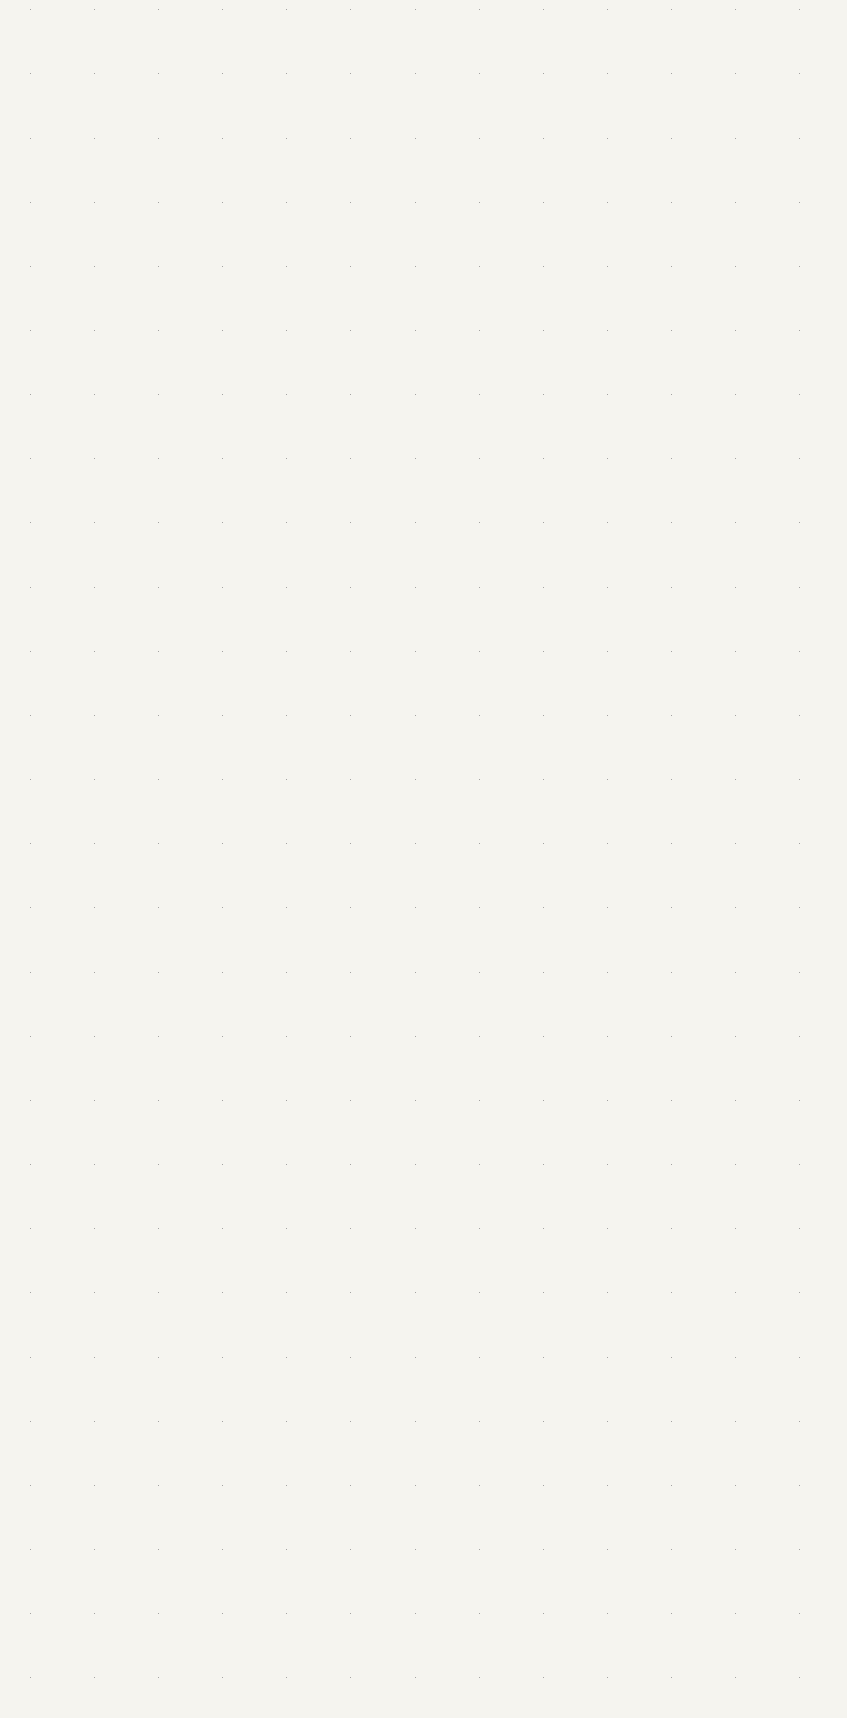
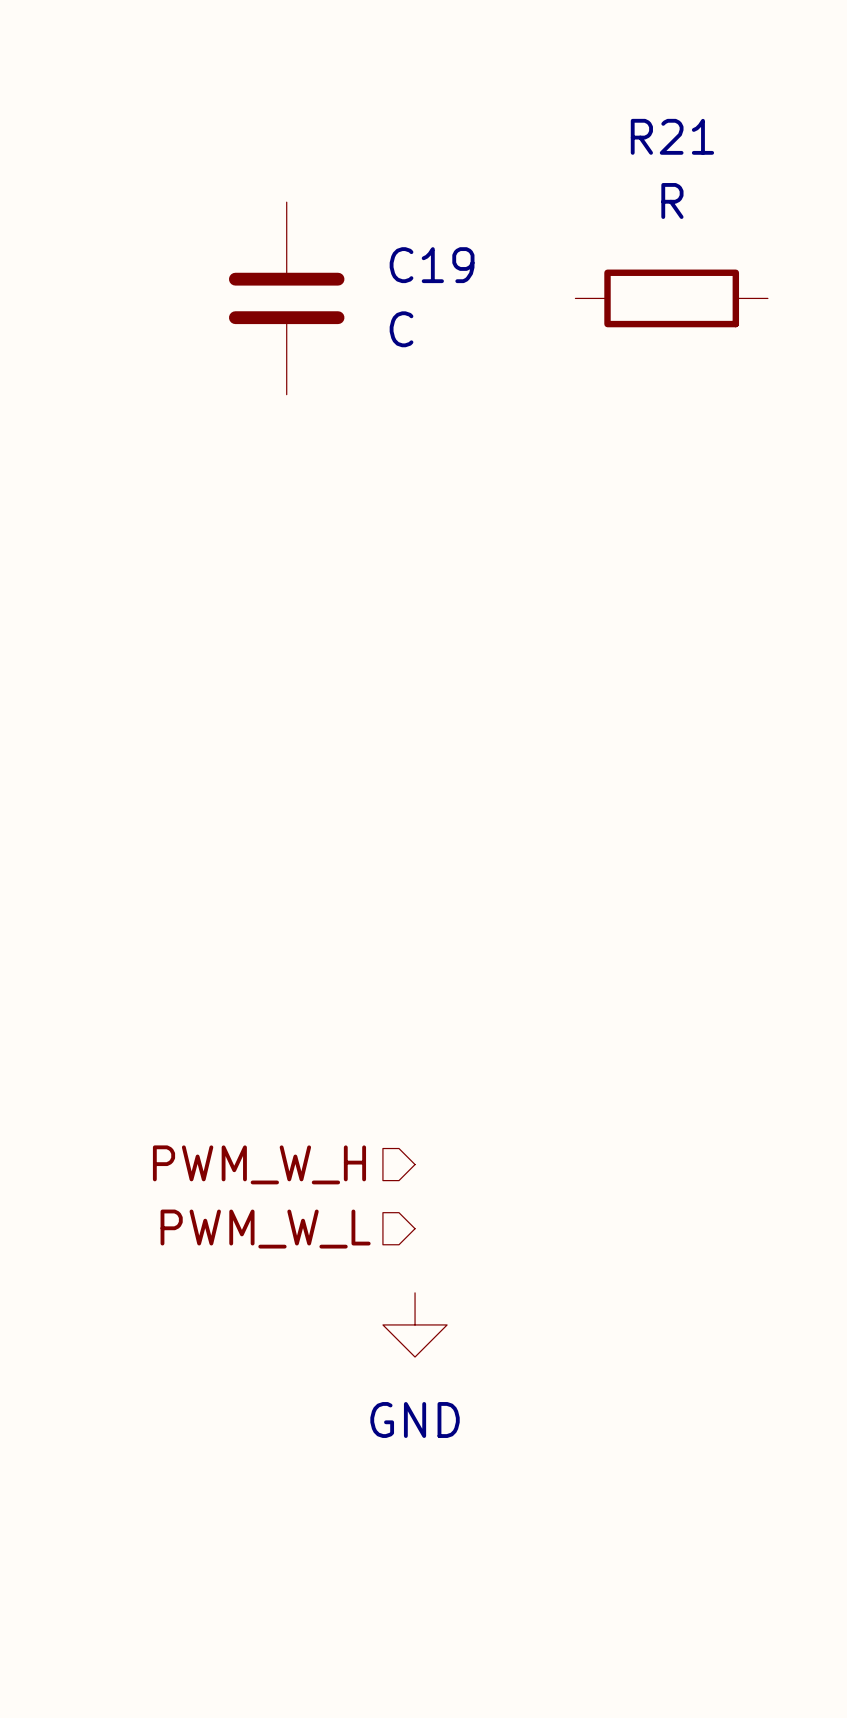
C19: none -> C (286, 298)
R21: none -> R (671, 298)
hierarchical label: none -> PWM_W_H (259, 1164)
hierarchical label: none -> PWM_W_L (265, 1229)
power symbol: none -> GND (415, 1324)

